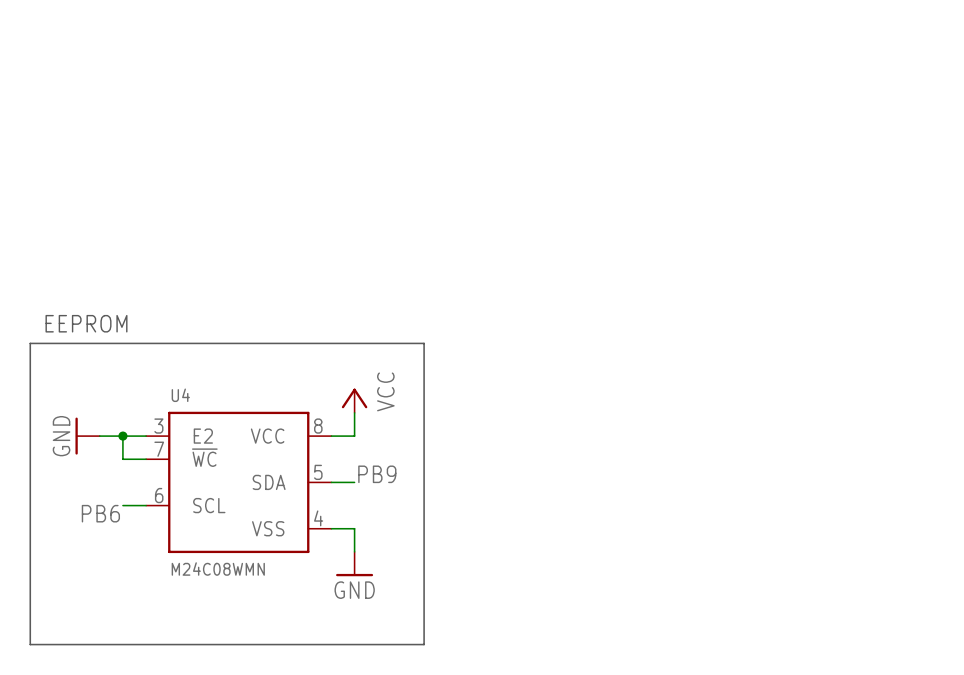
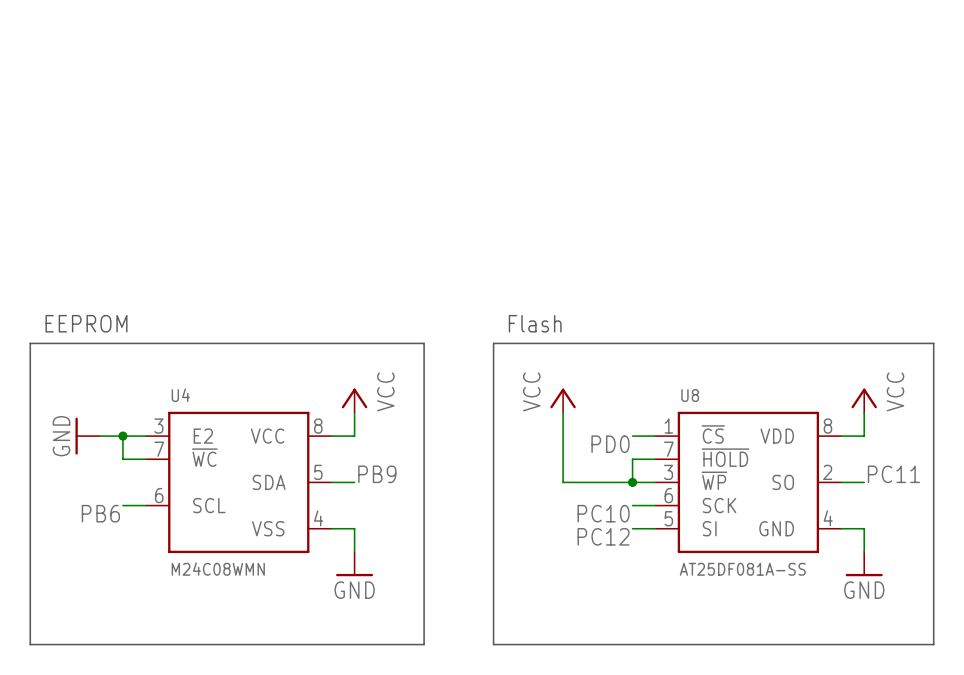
text: none -> Flash (535, 323)
line: none -> (493, 343) (933, 343) (933, 644) (493, 644) (493, 343)
power symbol: none -> VCC (563, 400)
power symbol: none -> VCC (864, 400)
wire: none -> (563, 412) (563, 482) (655, 482)
wire: none -> (864, 412) (864, 436) (841, 436)
wire: none -> (632, 436) (655, 436)
label: none -> PD0 (610, 444)
wire: none -> (655, 459) (632, 459) (632, 482)
label: none -> PC11 (893, 474)
junction: none -> (632, 482)
U8: none -> AT25DF081A-SS (748, 482)
wire: none -> (841, 482) (864, 482)
wire: none -> (632, 505) (655, 505)
label: none -> PC10 (603, 513)
wire: none -> (632, 528) (655, 528)
wire: none -> (841, 528) (864, 528) (864, 551)
label: none -> PC12 (603, 536)
power symbol: none -> GND (864, 564)

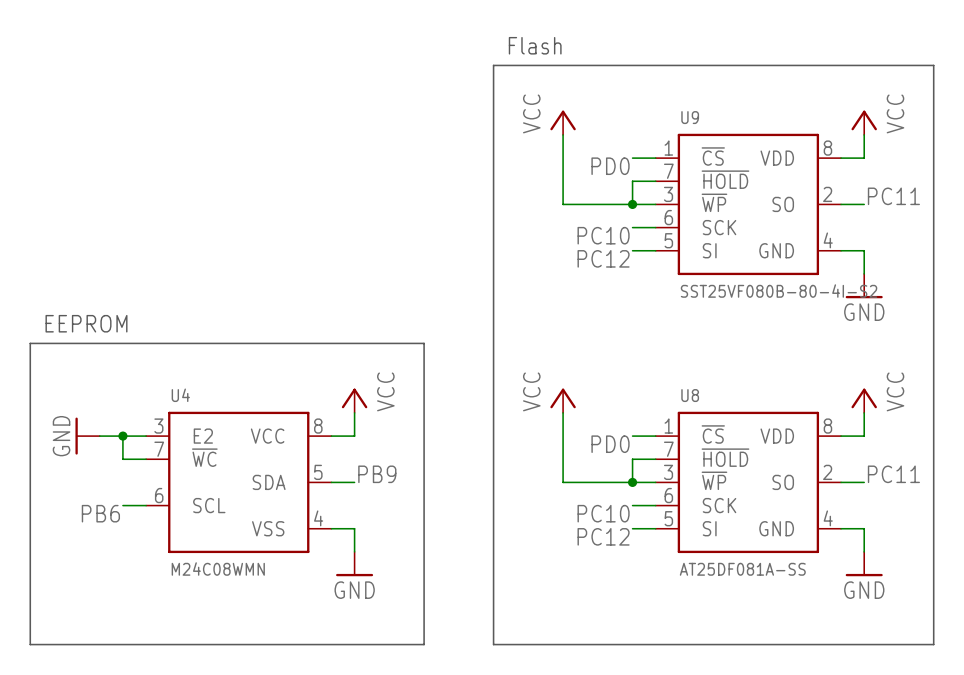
text: none -> Flash (535, 45)
power symbol: none -> VCC (563, 122)
power symbol: none -> VCC (864, 122)
wire: none -> (563, 134) (563, 204) (655, 204)
wire: none -> (864, 134) (864, 158) (841, 158)
wire: none -> (632, 158) (655, 158)
label: none -> PD0 (610, 166)
wire: none -> (655, 181) (632, 181) (632, 204)
label: none -> PC11 (893, 196)
junction: none -> (632, 204)
U9: none -> SST25VF080B-80-4I-S2 (748, 204)
wire: none -> (841, 204) (864, 204)
wire: none -> (632, 227) (655, 227)
label: none -> PC10 (603, 235)
wire: none -> (632, 250) (655, 250)
wire: none -> (841, 250) (864, 250) (864, 273)
label: none -> PC12 (603, 258)
power symbol: none -> GND (864, 286)
text: Flash (535, 323) -> none
line: (493, 343) (933, 343) -> (493, 343) (493, 65) (933, 65) (933, 343)

